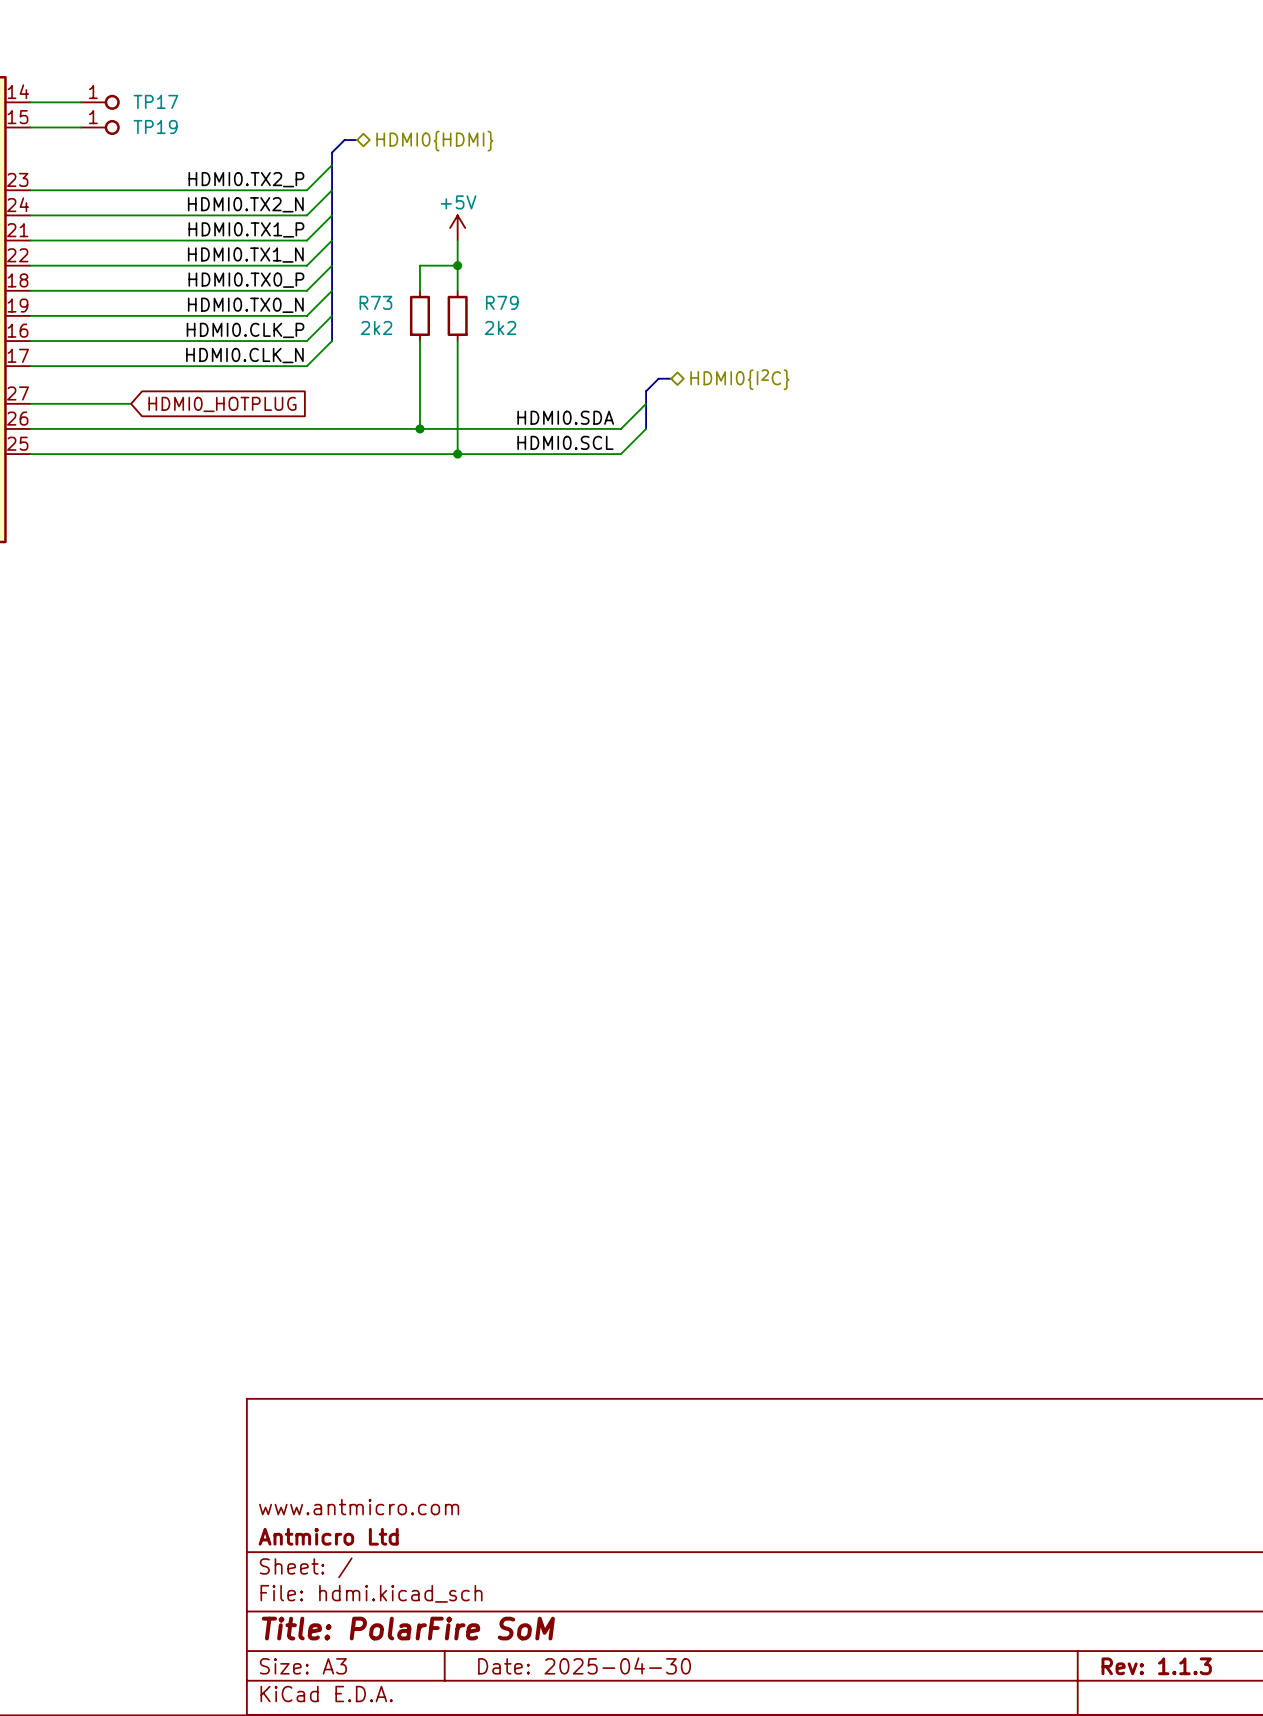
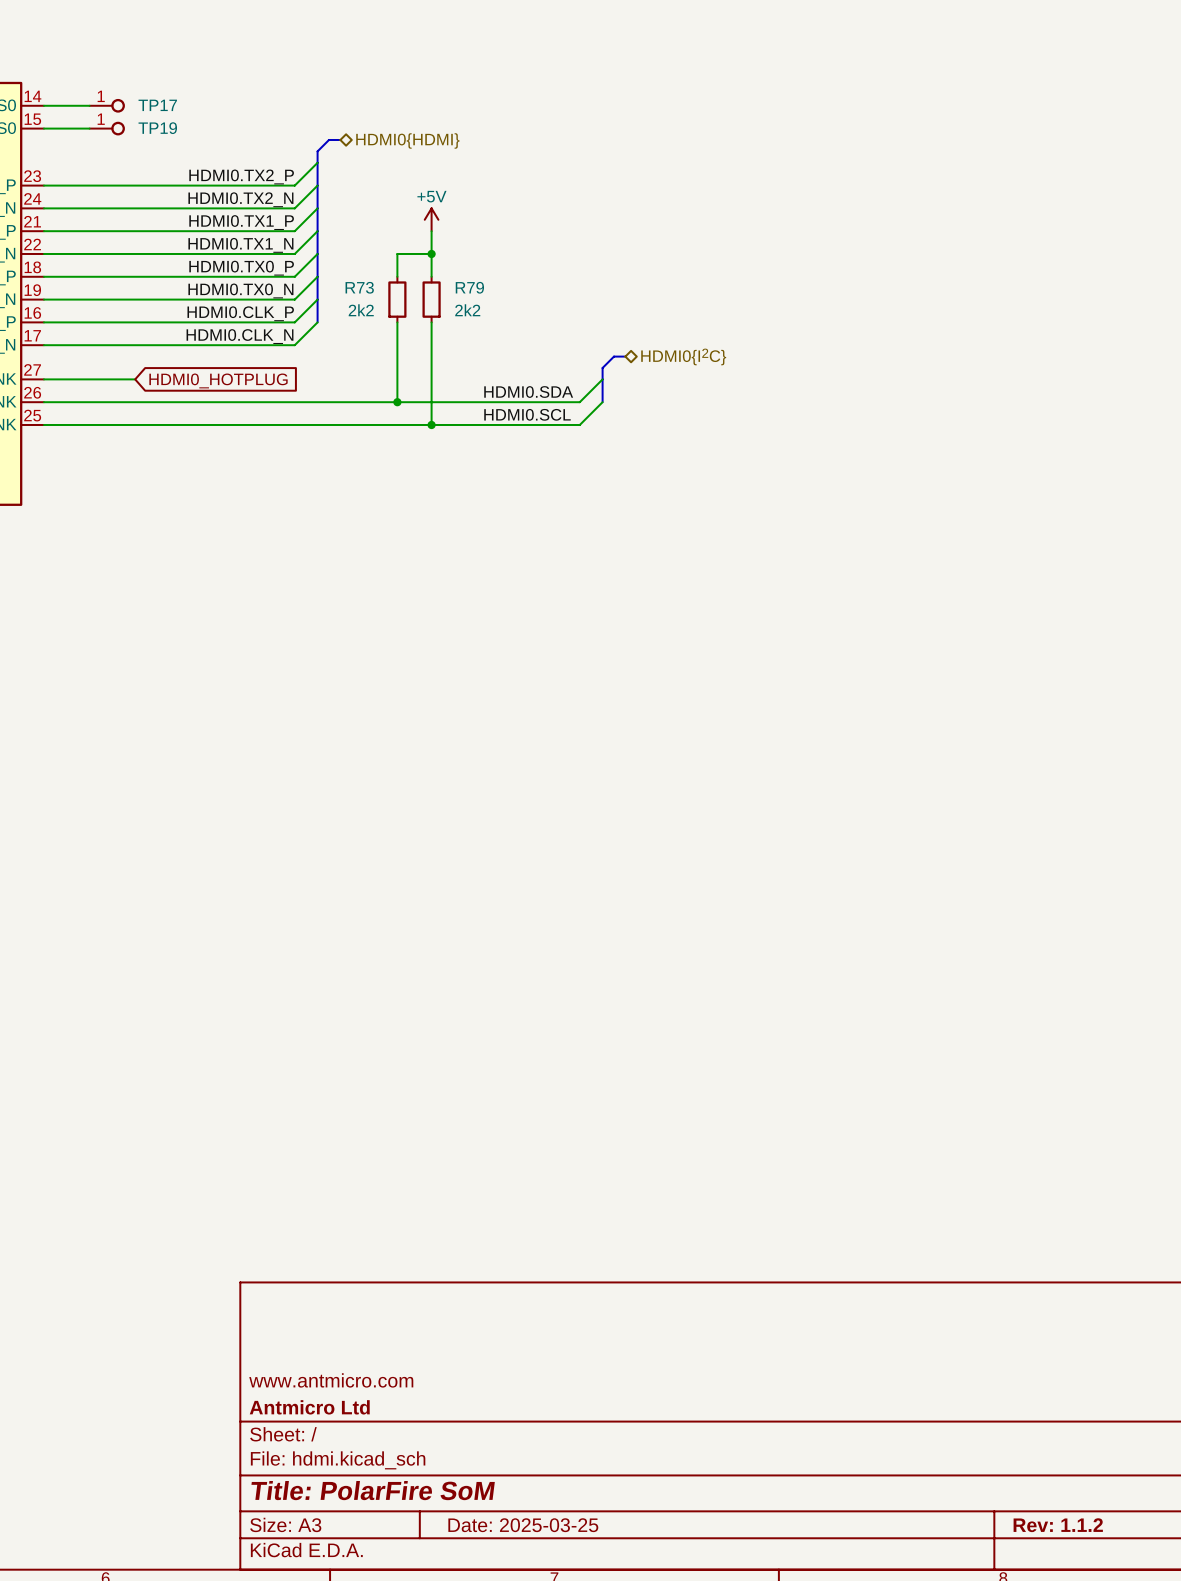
title block: Date: 2025-04-30 (584, 1665) -> Date: 2025-03-25 (523, 1525)
title block: Rev: 1.1.3 (1156, 1666) -> Rev: 1.1.2 (1058, 1525)

